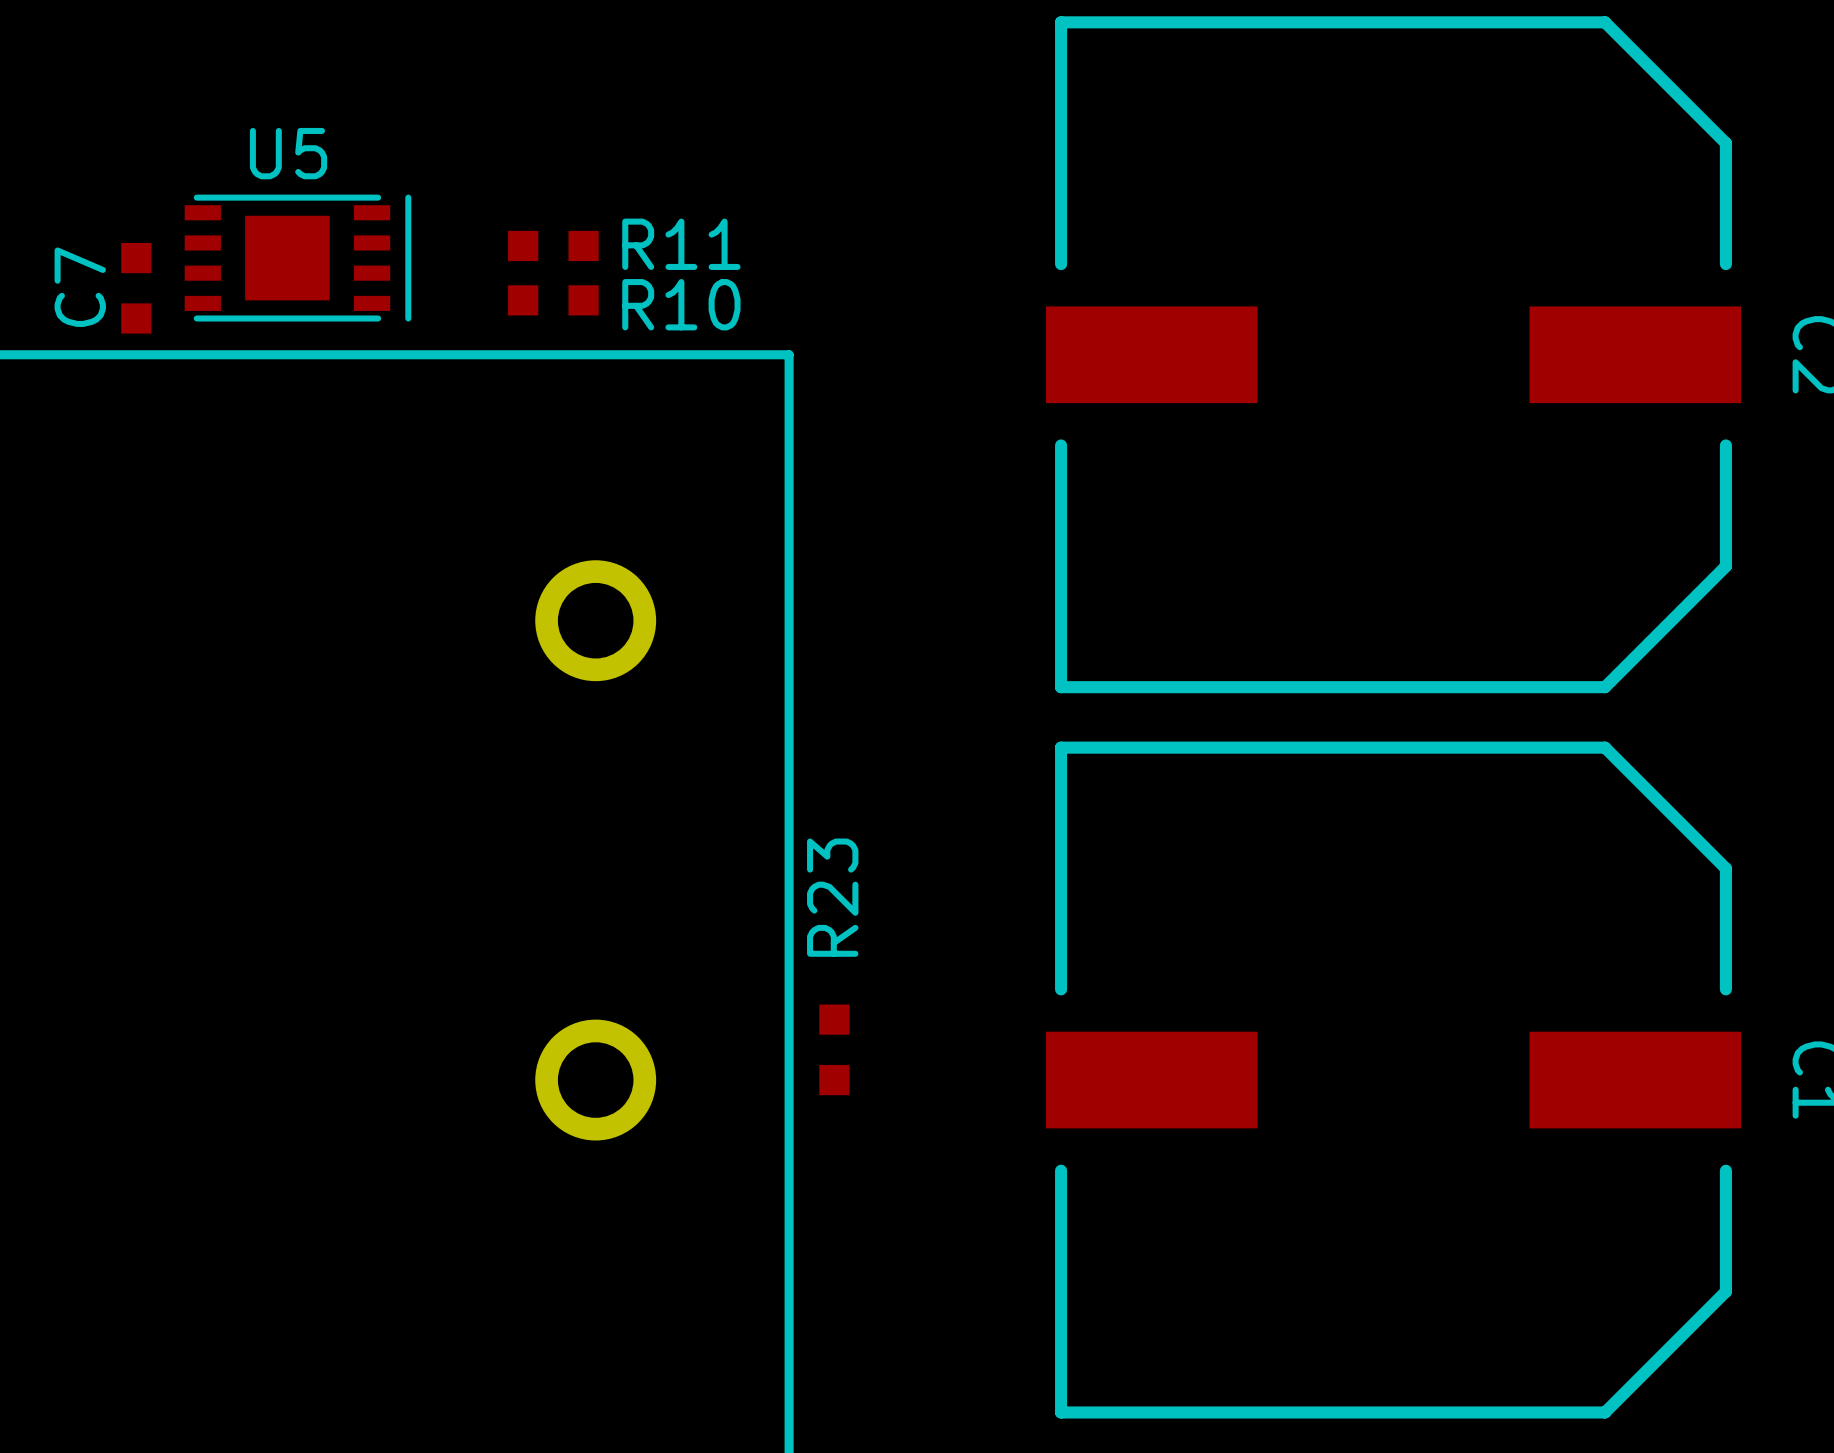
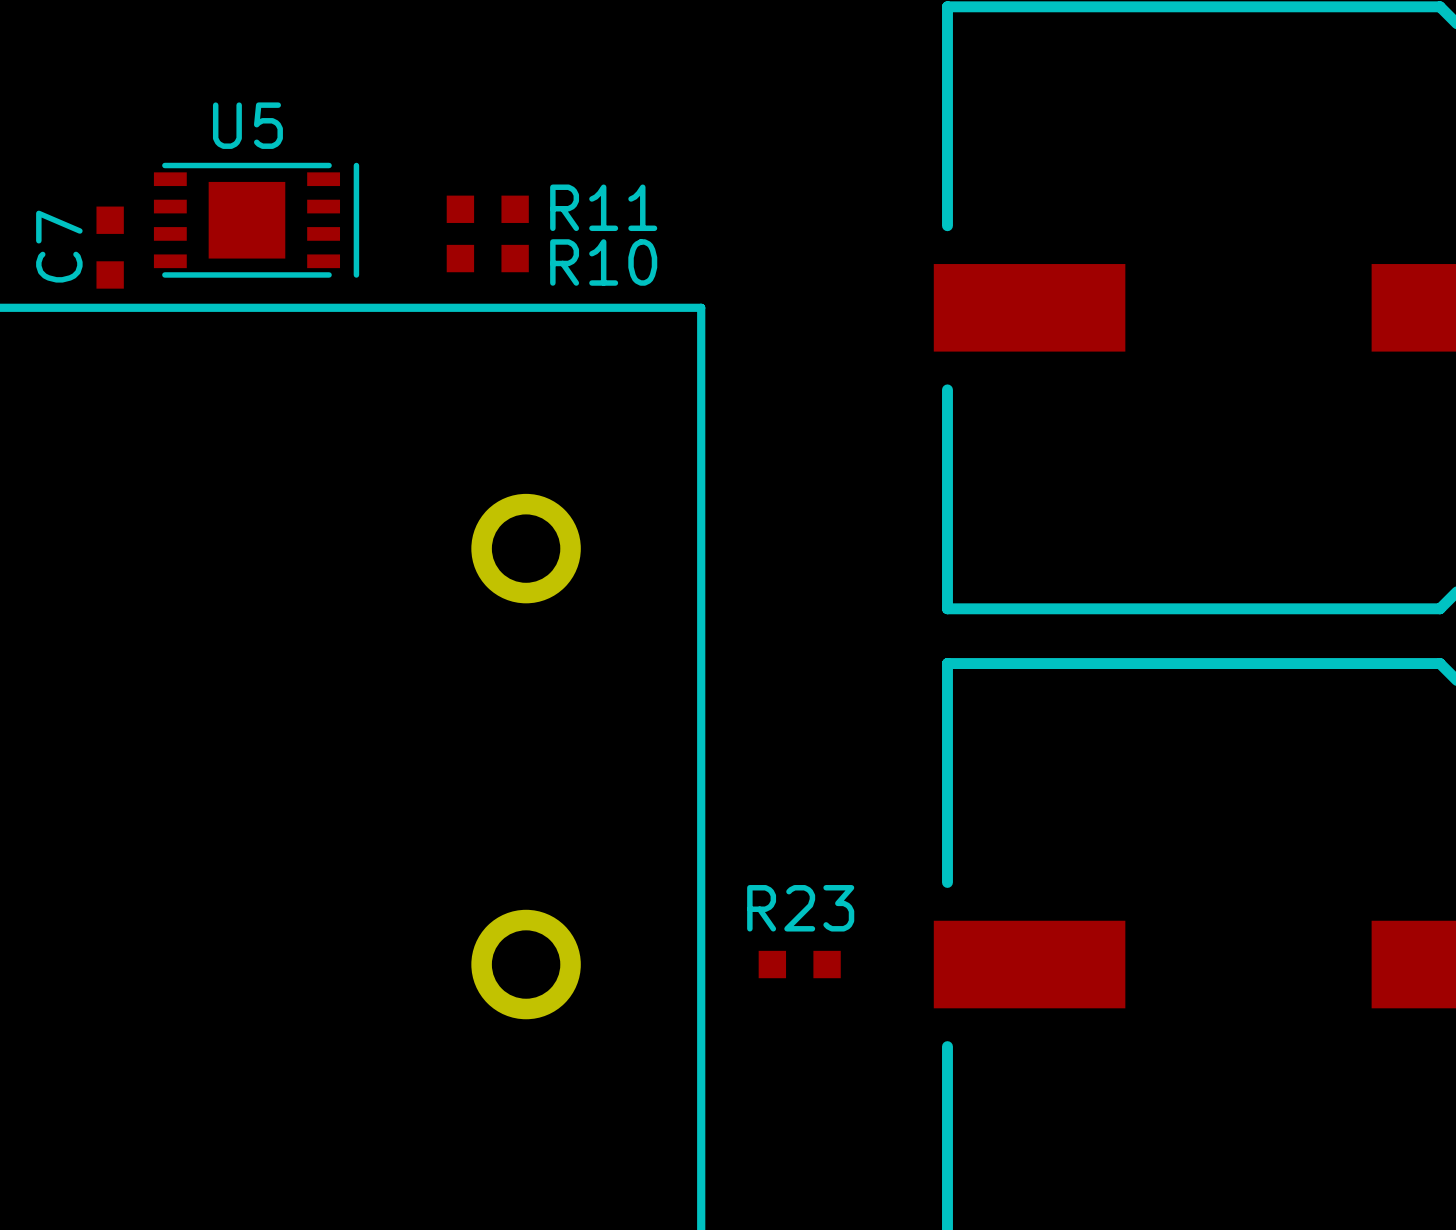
R23 rotation: 0° (834, 1049) -> 90° clockwise (799, 964)
R23 position: (834, 1049) -> (799, 964)

